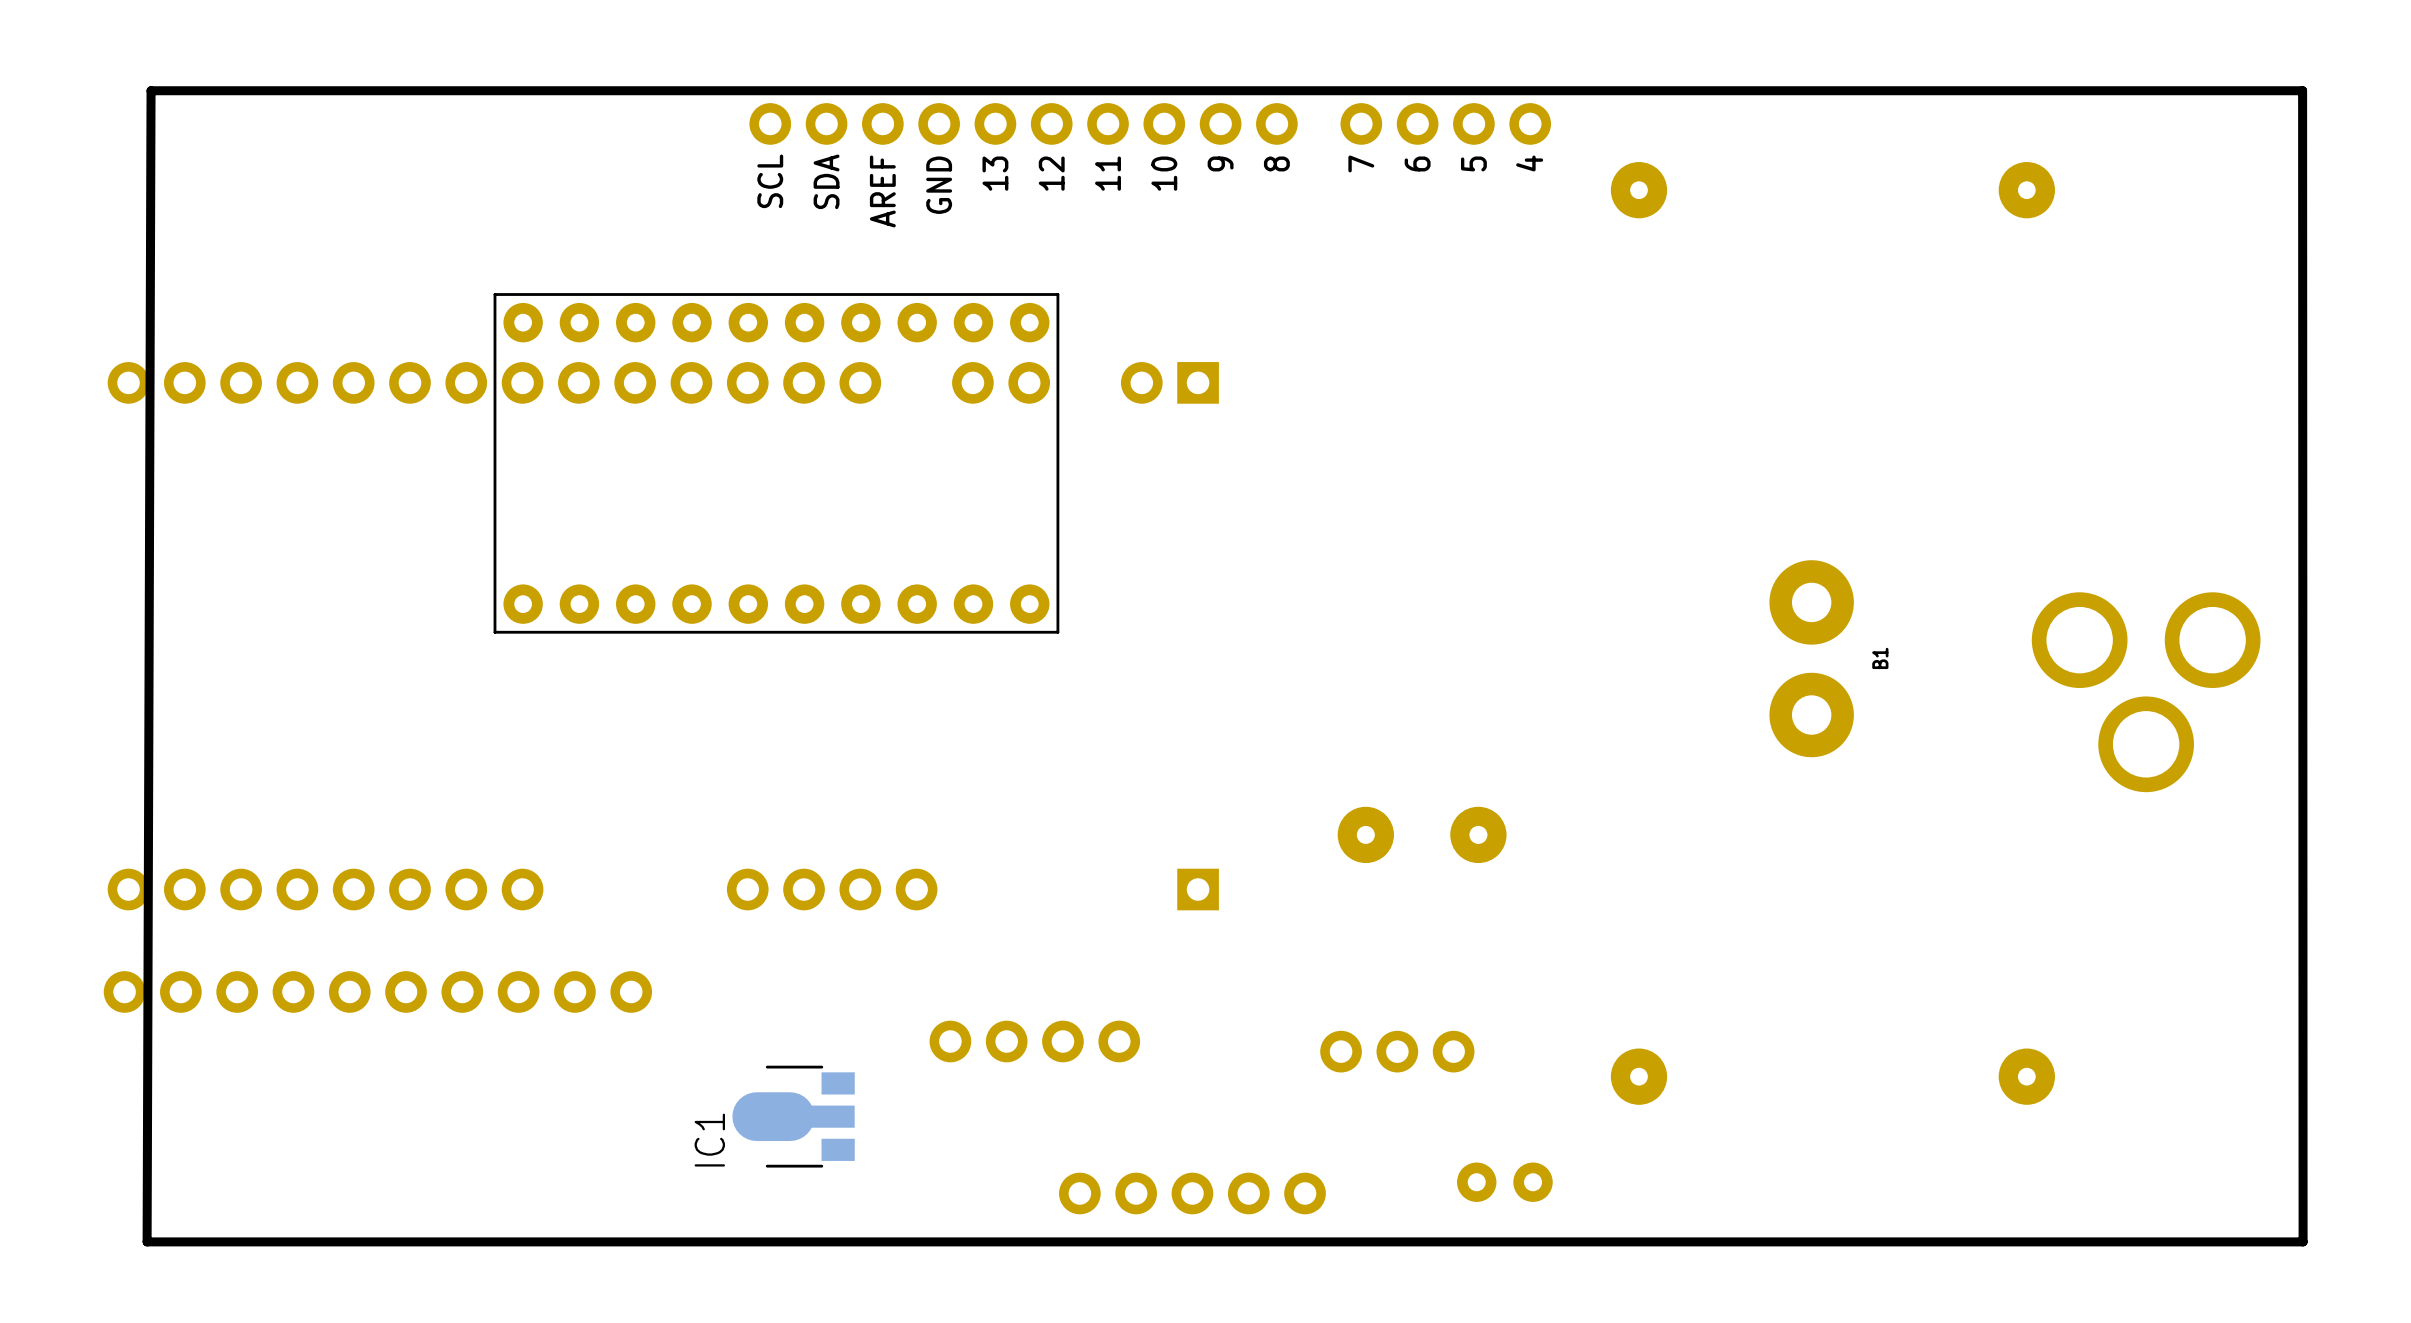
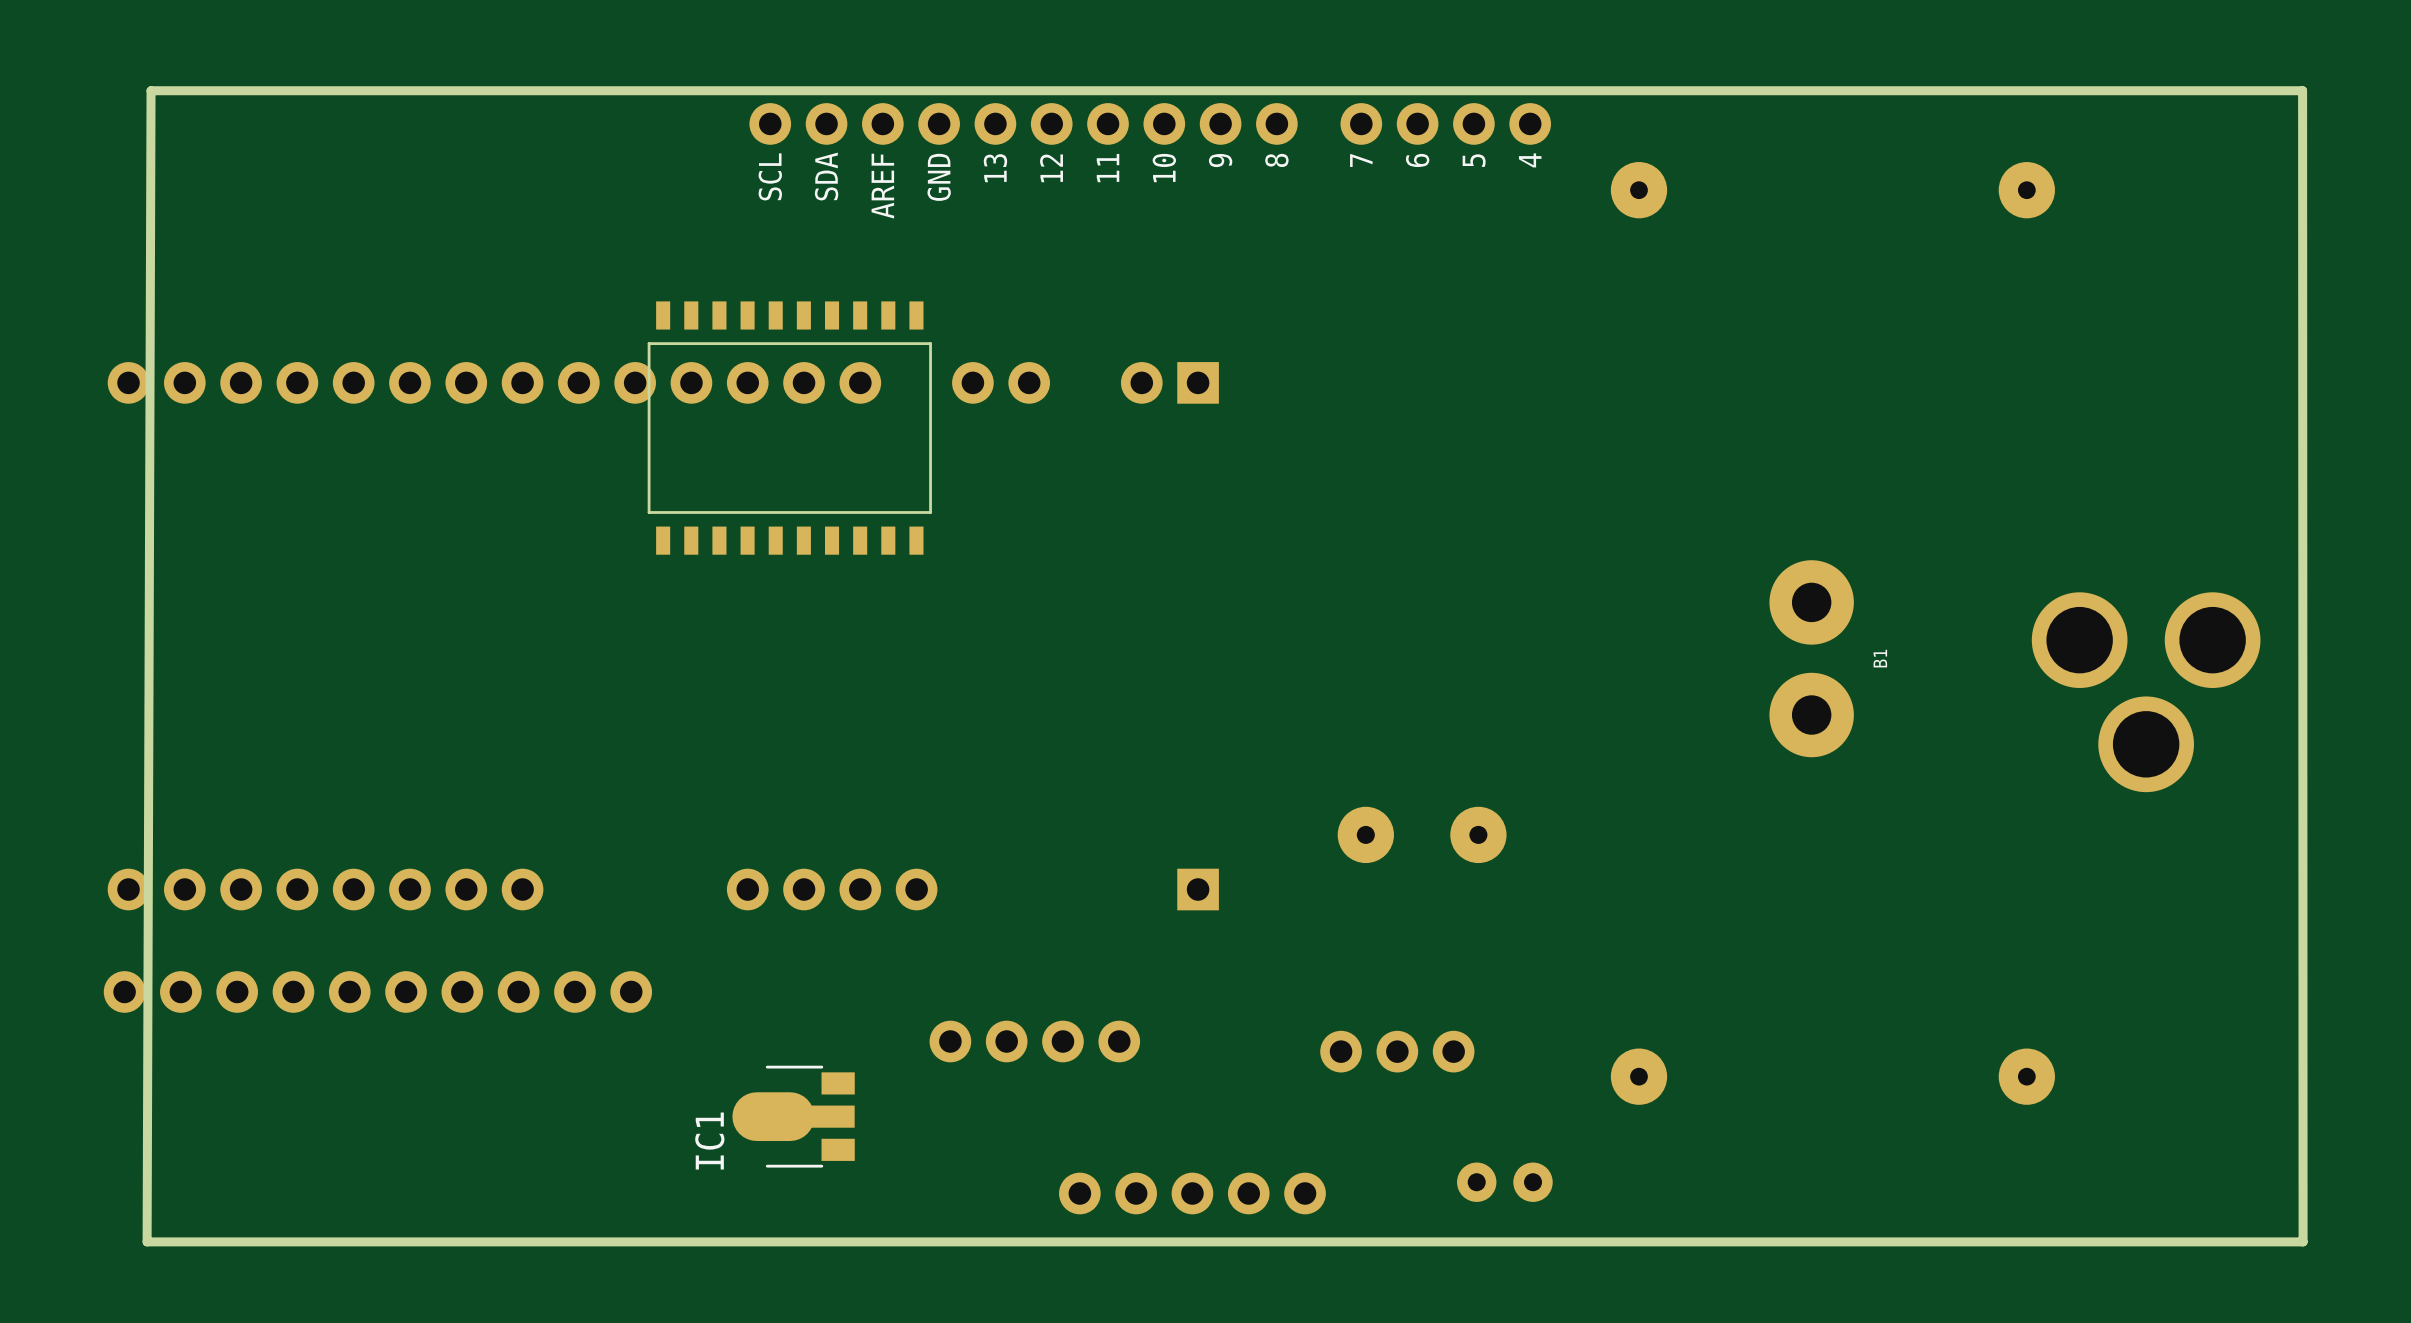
part: none -> (789, 428)
part: (776, 463) -> none

